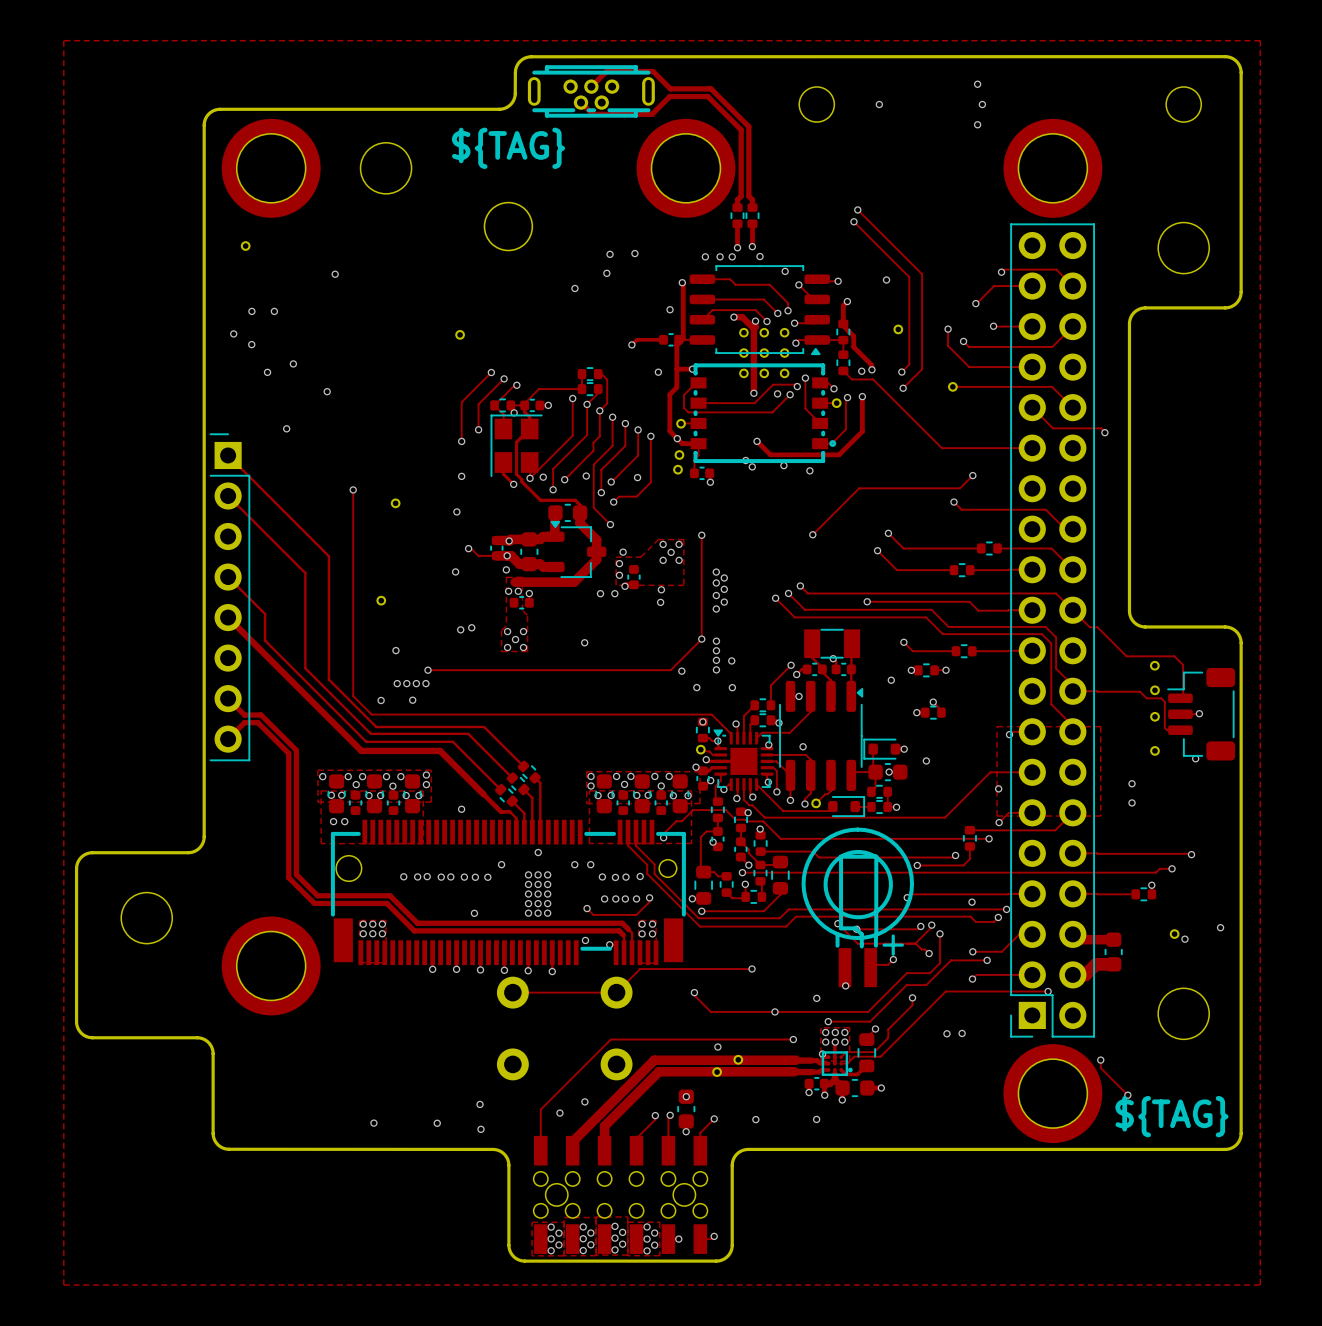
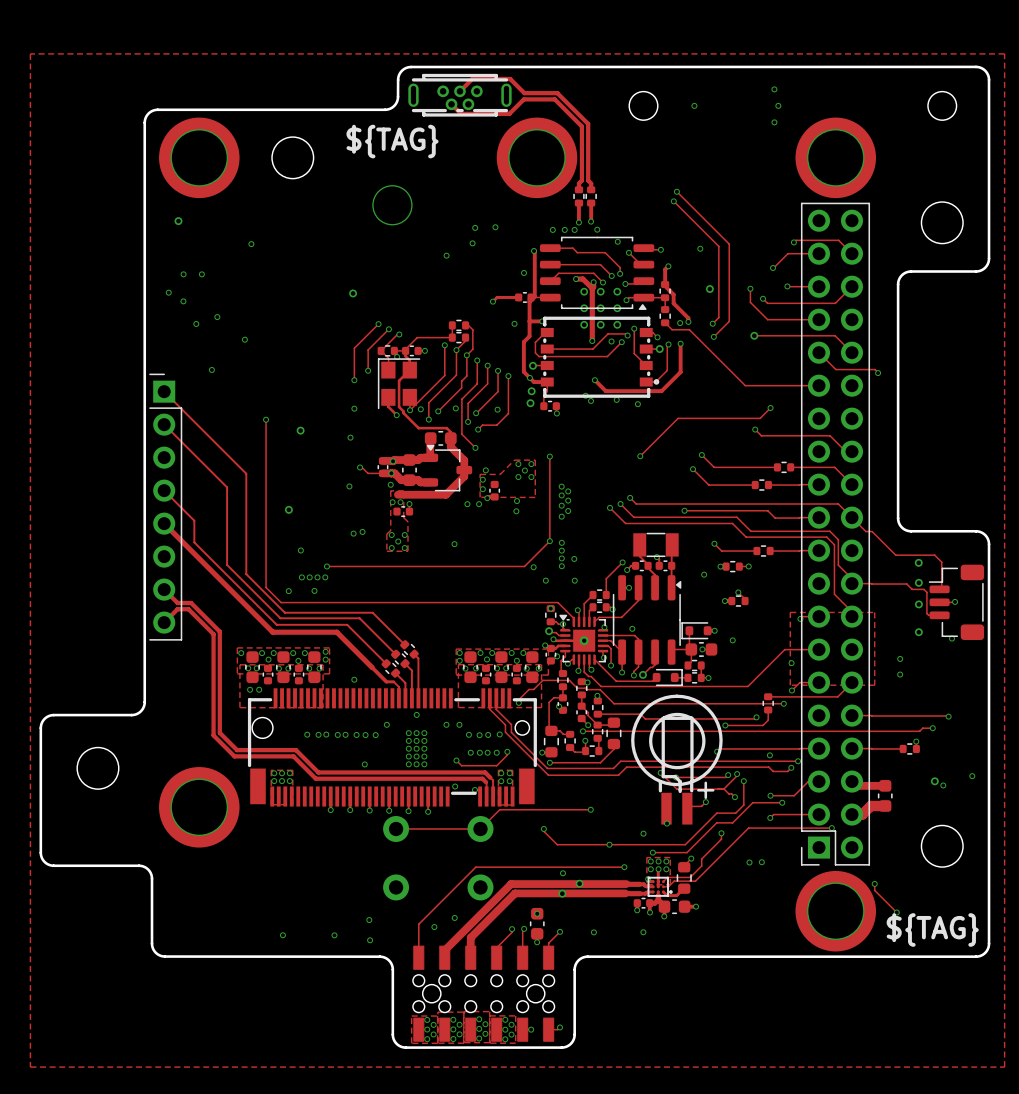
via: none -> (584, 640)

